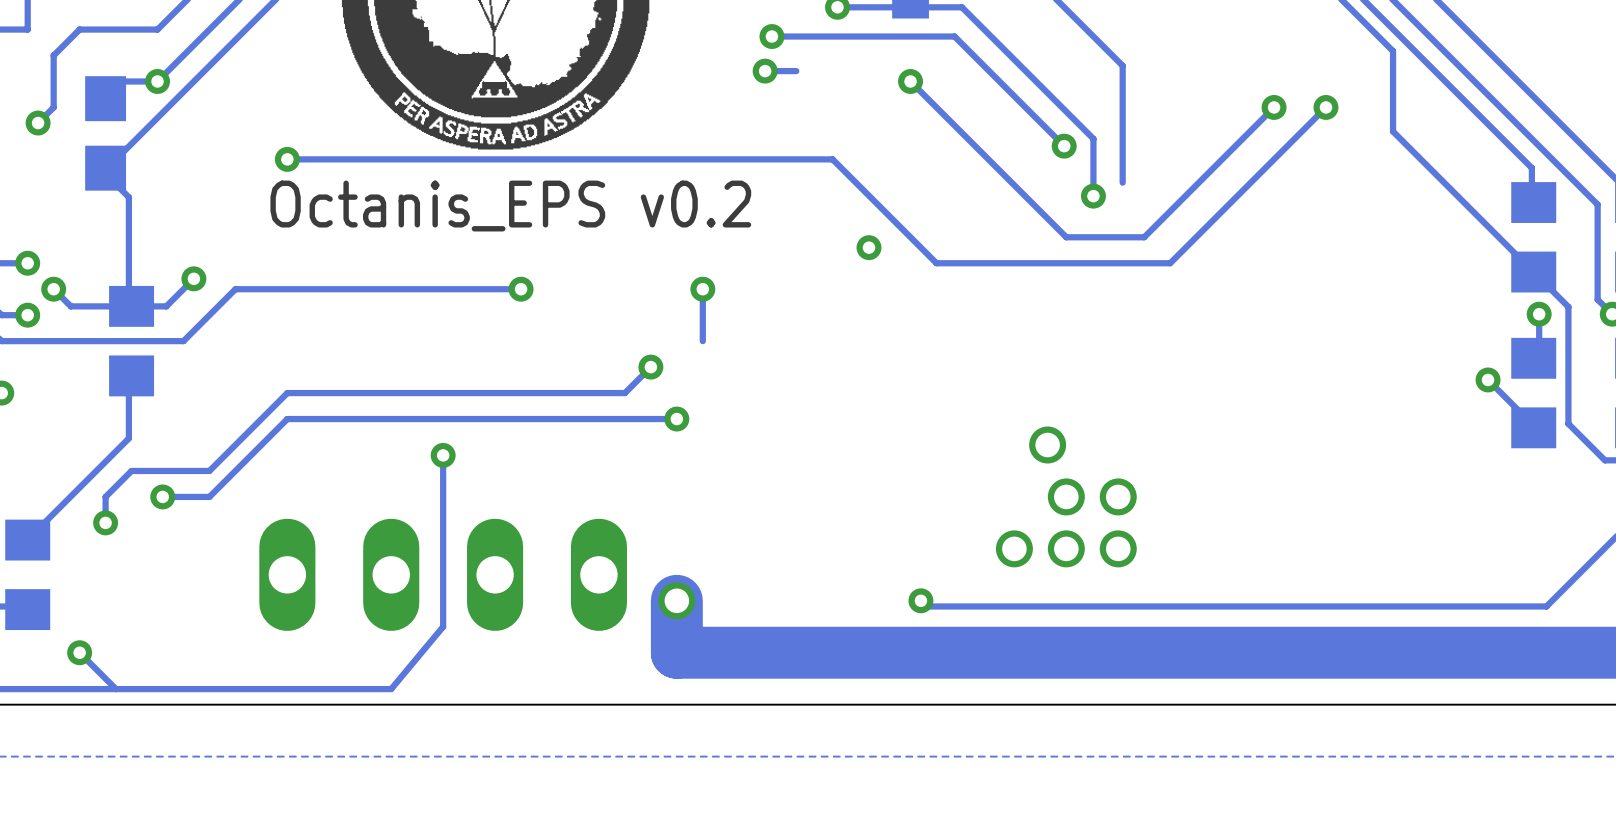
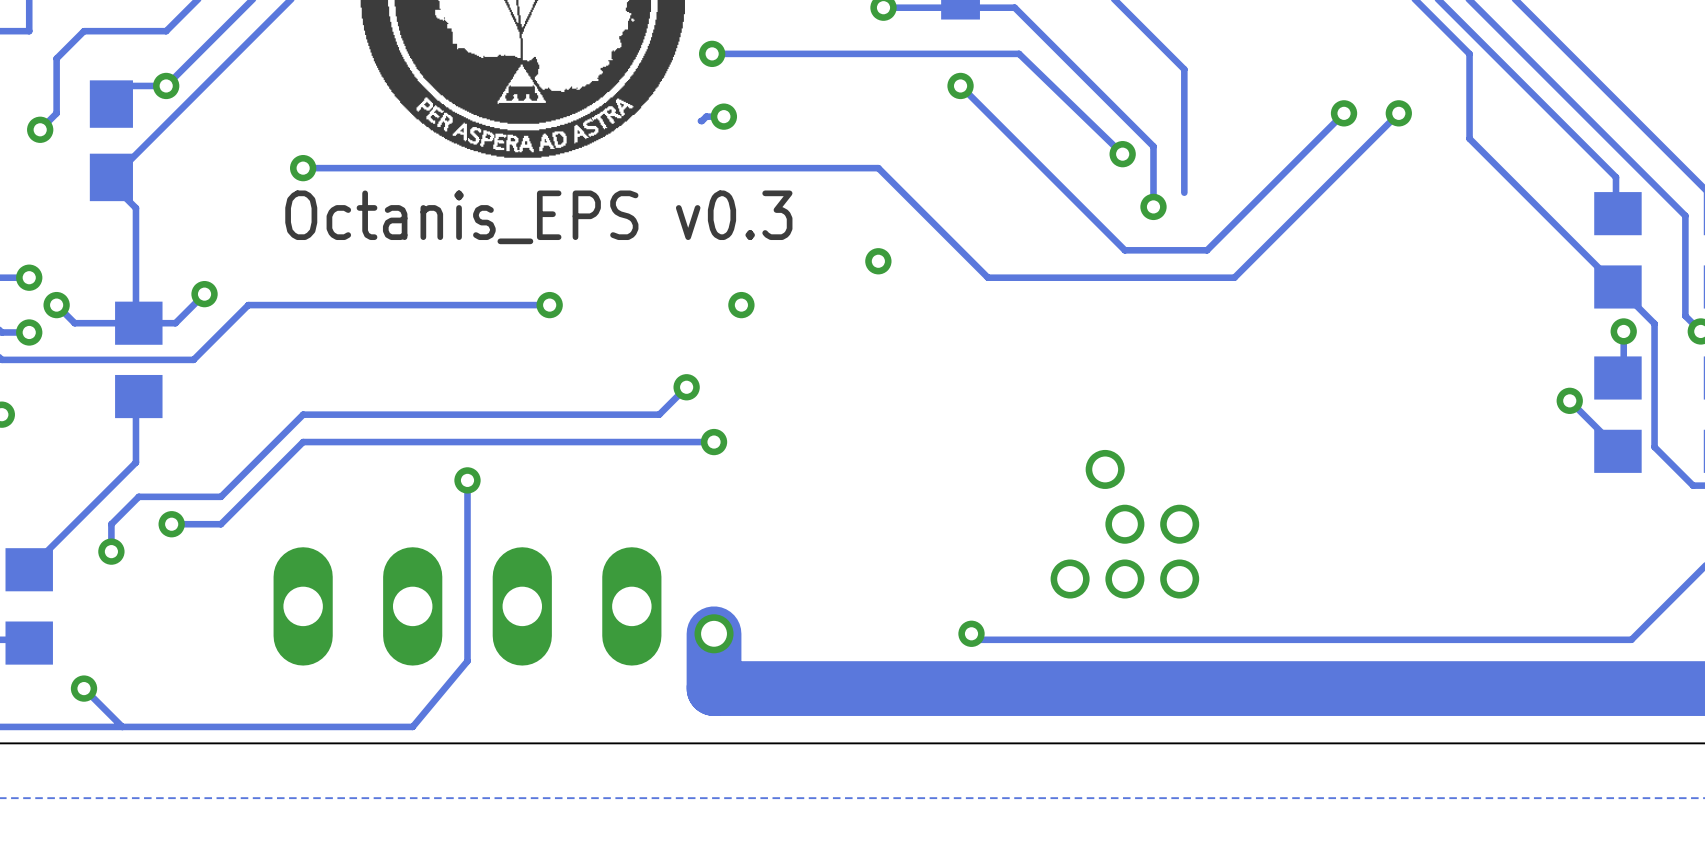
track: (771, 36) (954, 36) (1064, 146) -> (712, 53) (1019, 53) (1122, 154)
via: (771, 36) -> none
via: none -> (712, 53)
via: (765, 71) -> none
track: (796, 71) (765, 71) -> none
track: none -> (723, 116) (706, 116) (700, 121)
via: none -> (723, 116)
text: Octanis_EPS v0.2 (510, 206) -> Octanis_EPS v0.3 (538, 217)
via position: (869, 247) -> (878, 261)
track: (702, 289) (702, 341) -> none

